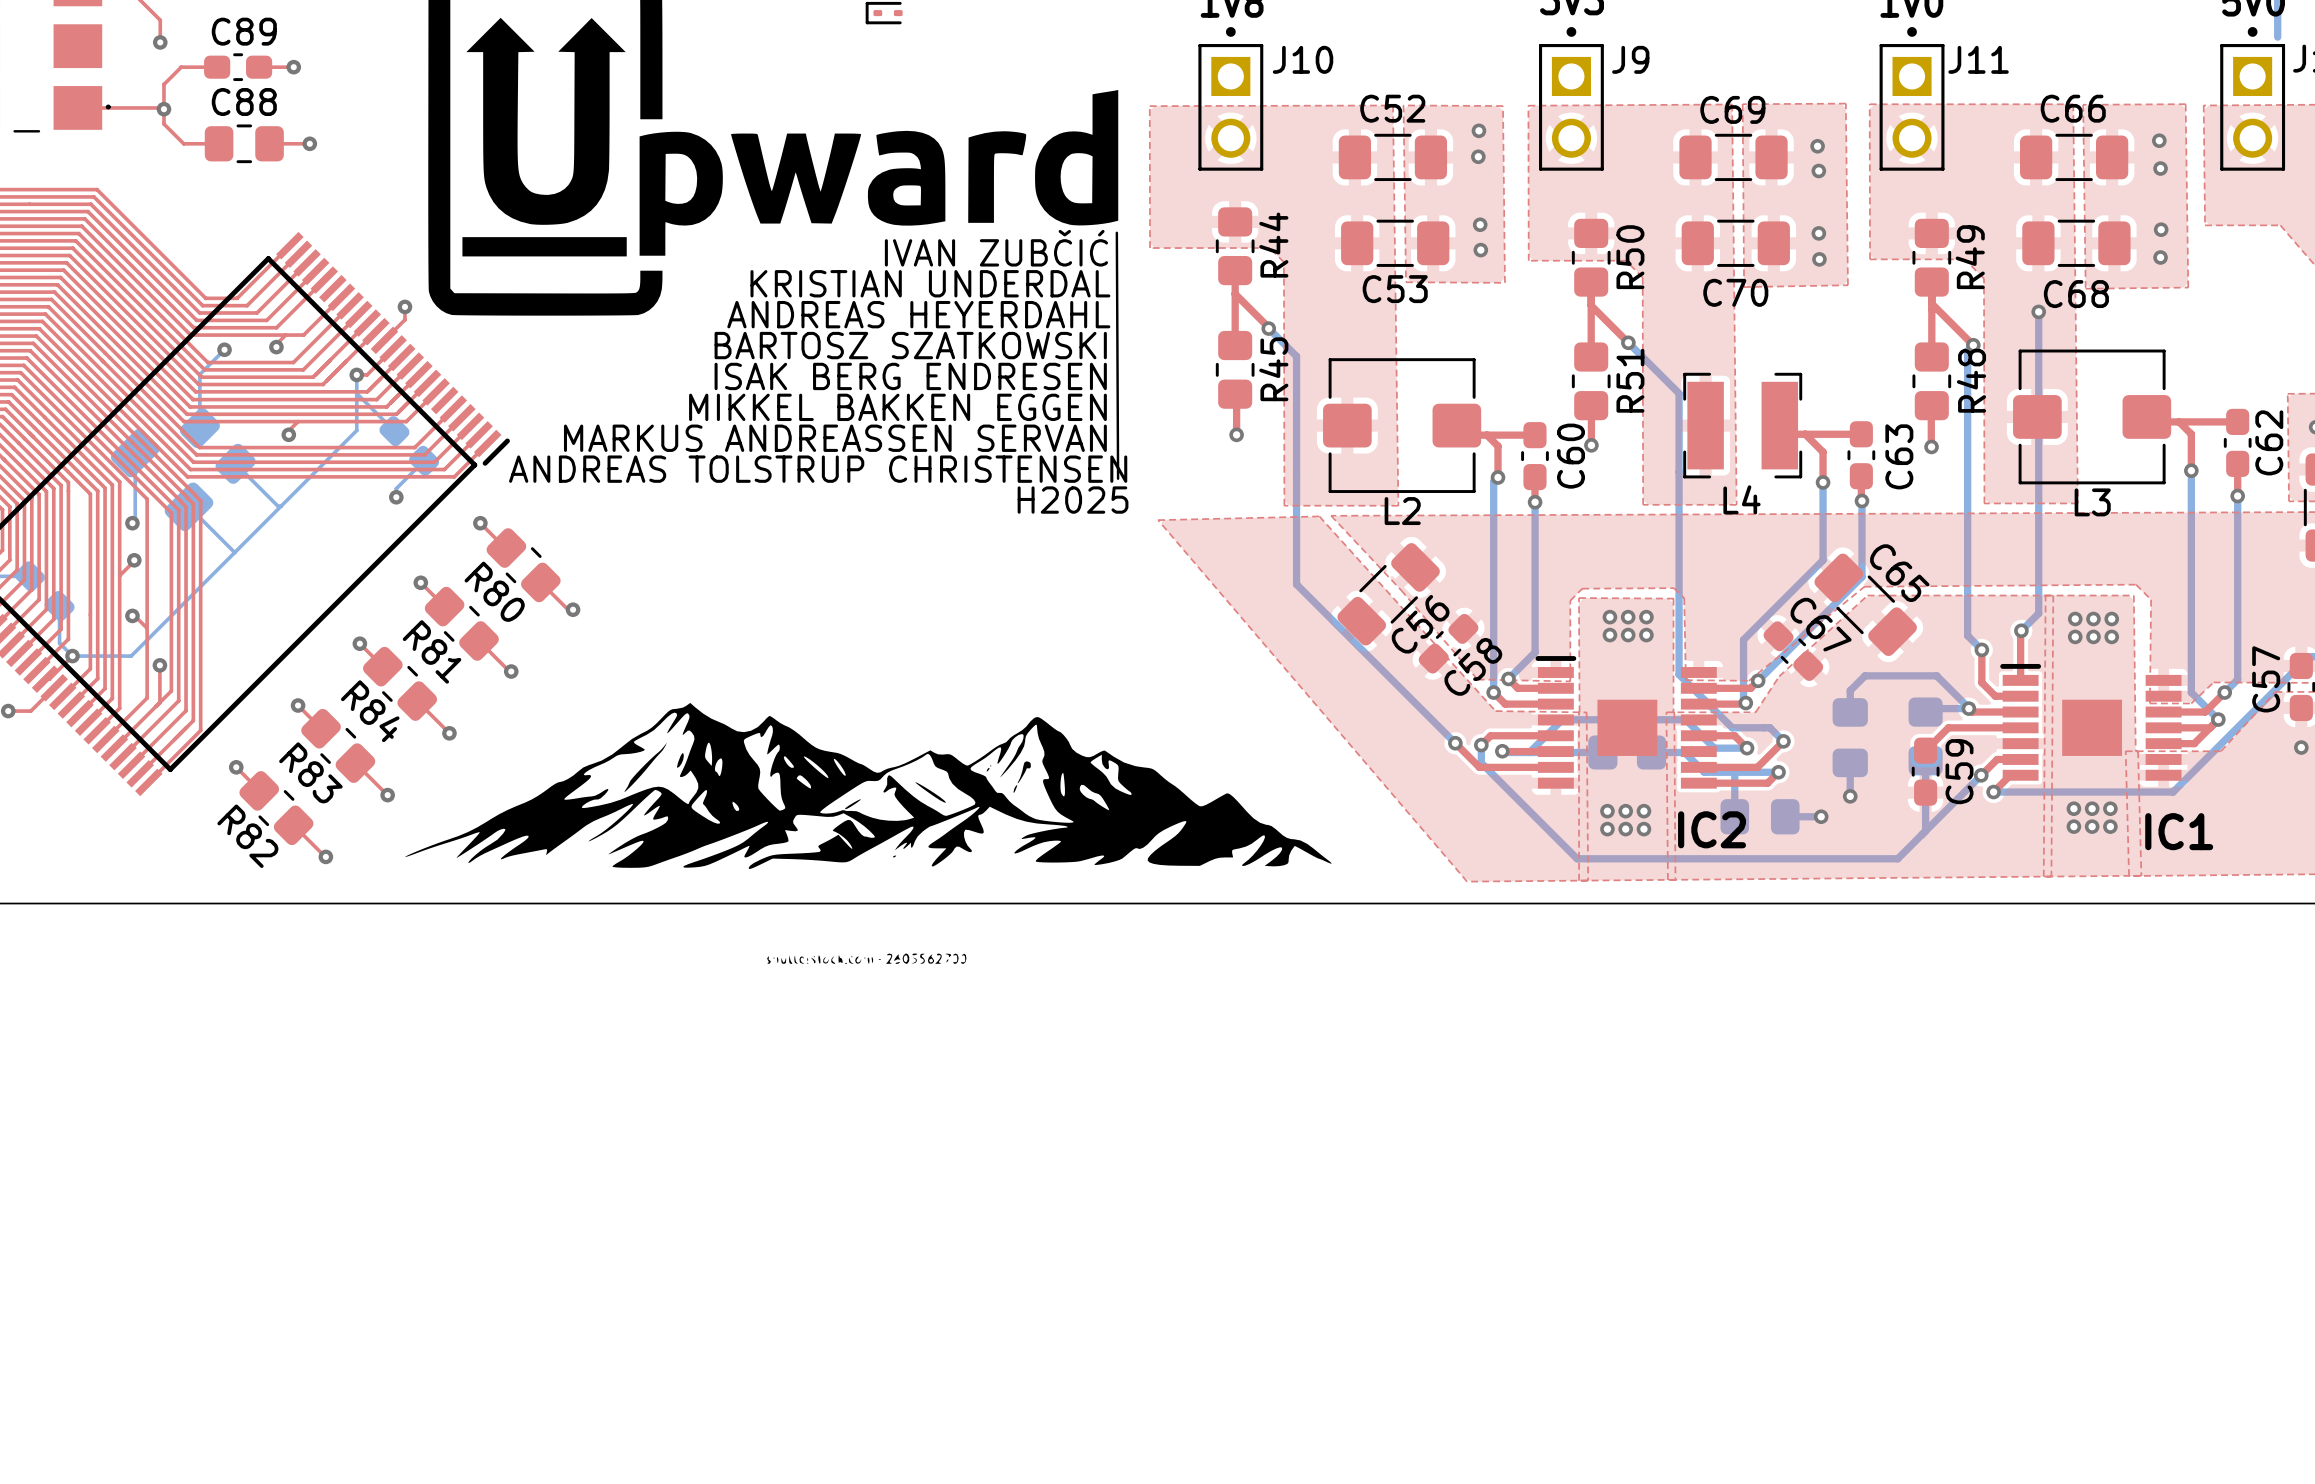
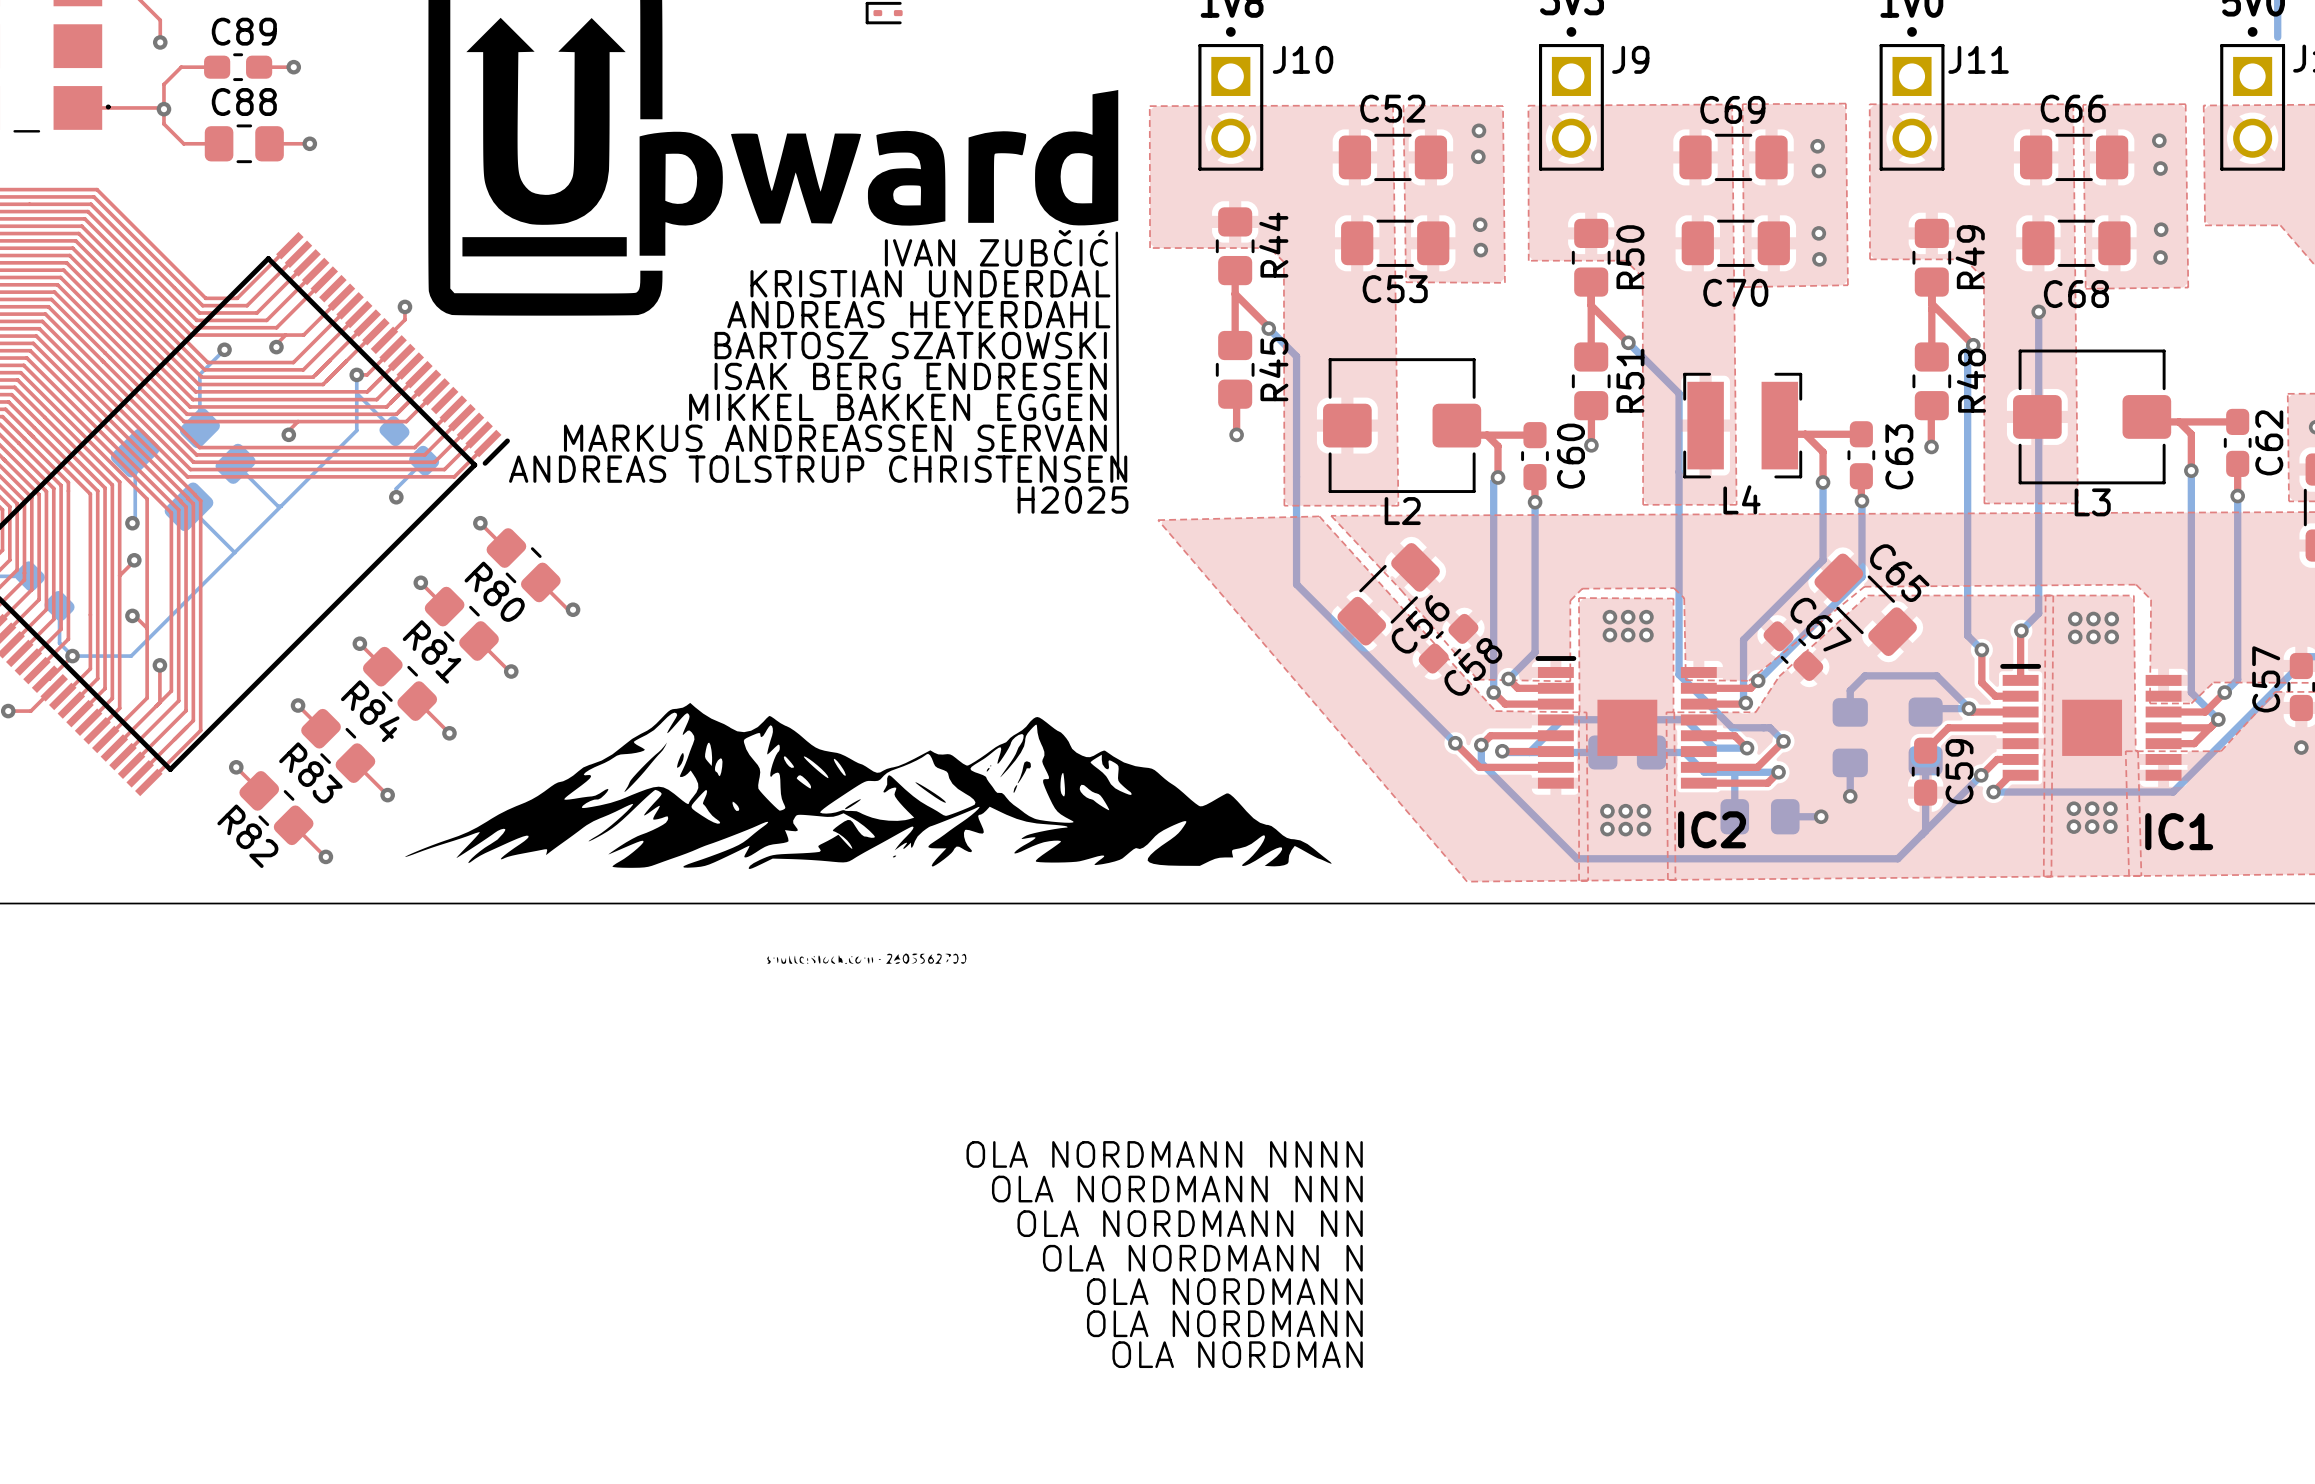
text: none -> OLA NORDMANN NNNN (1164, 1154)
text: none -> OLA NORDMANN NNN (1177, 1189)
text: none -> OLA NORDMANN NN (1190, 1223)
text: none -> OLA NORDMANN N (1202, 1258)
text: none -> OLA NORDMANN (1224, 1291)
text: none -> OLA NORDMANN (1224, 1323)
text: none -> OLA NORDMAN (1237, 1354)

